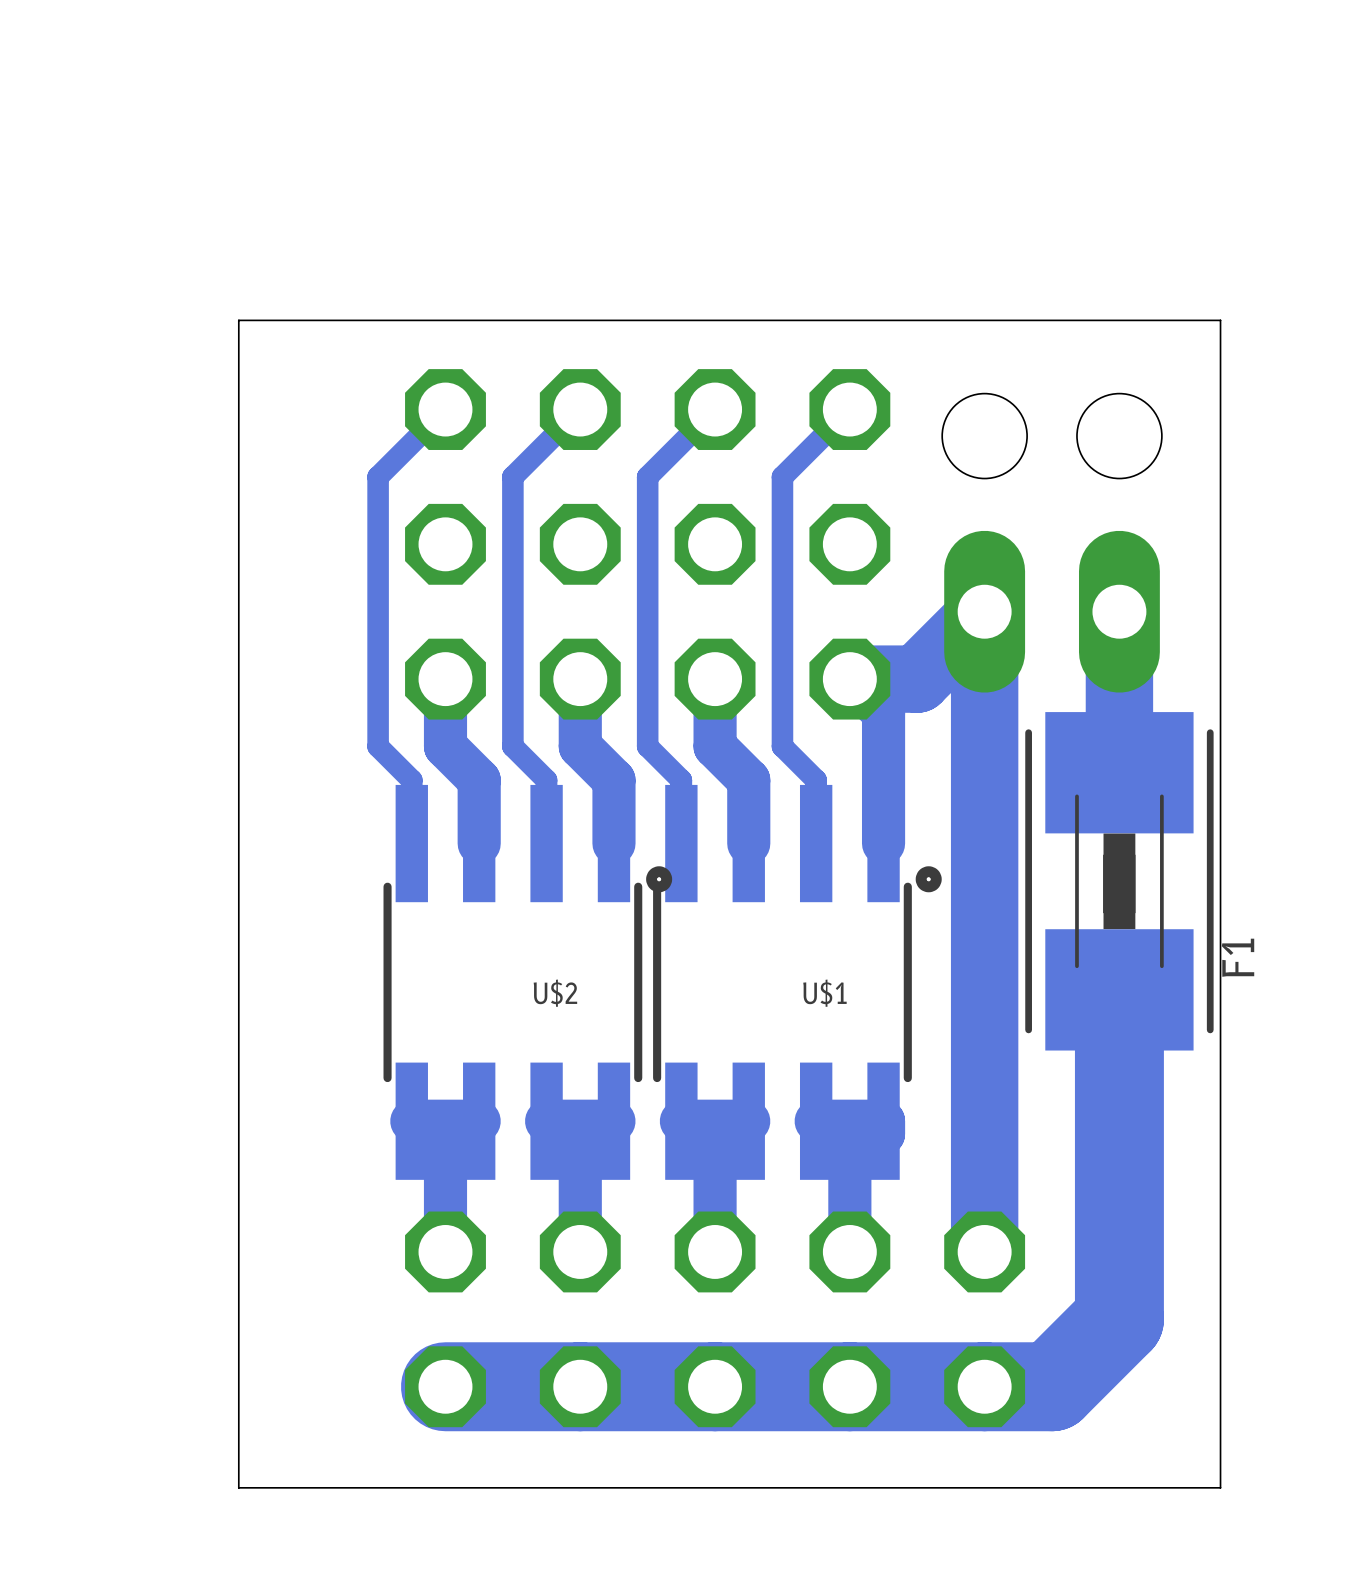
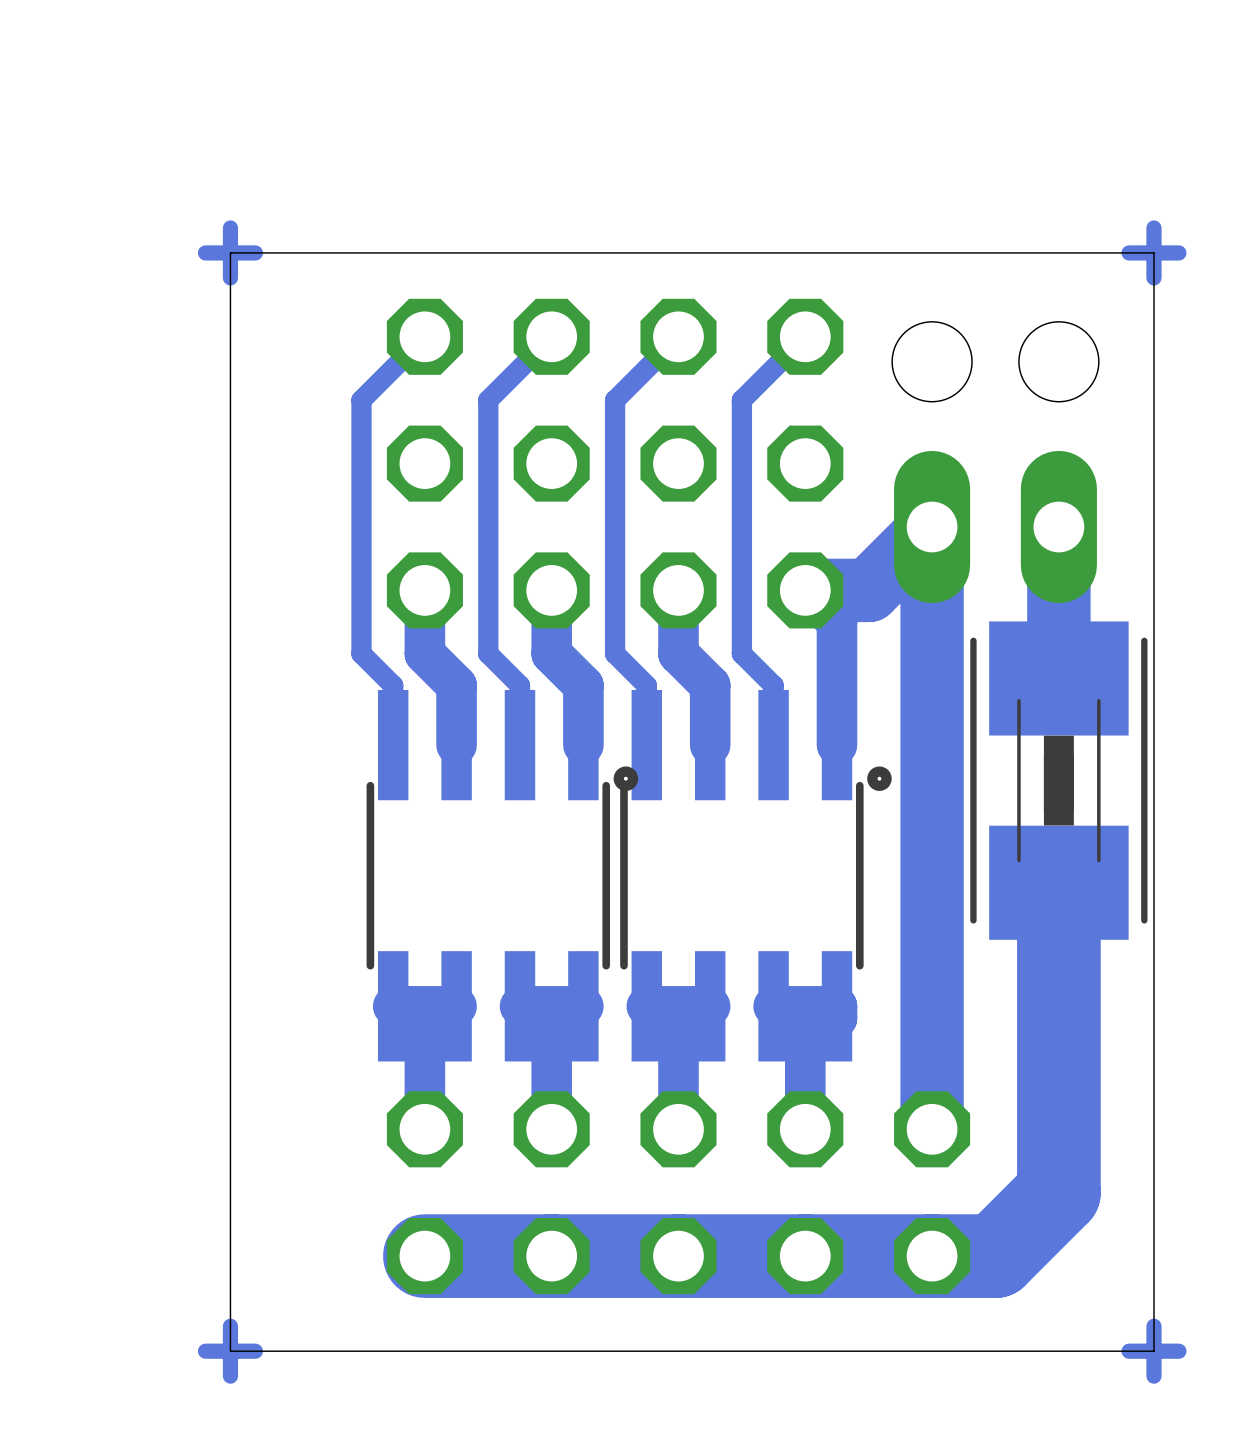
track: none -> (230, 227) (230, 277)
track: none -> (1153, 227) (1153, 277)
track: none -> (255, 252) (205, 252)
track: none -> (1178, 252) (1129, 252)
F1 name: F1 (1238, 957) -> none
U$2 name: U$2 (555, 993) -> none
U$1 name: U$1 (824, 993) -> none
track: none -> (230, 1326) (230, 1376)
track: none -> (1153, 1326) (1153, 1376)
track: none -> (255, 1351) (205, 1351)
track: none -> (1178, 1351) (1129, 1351)

